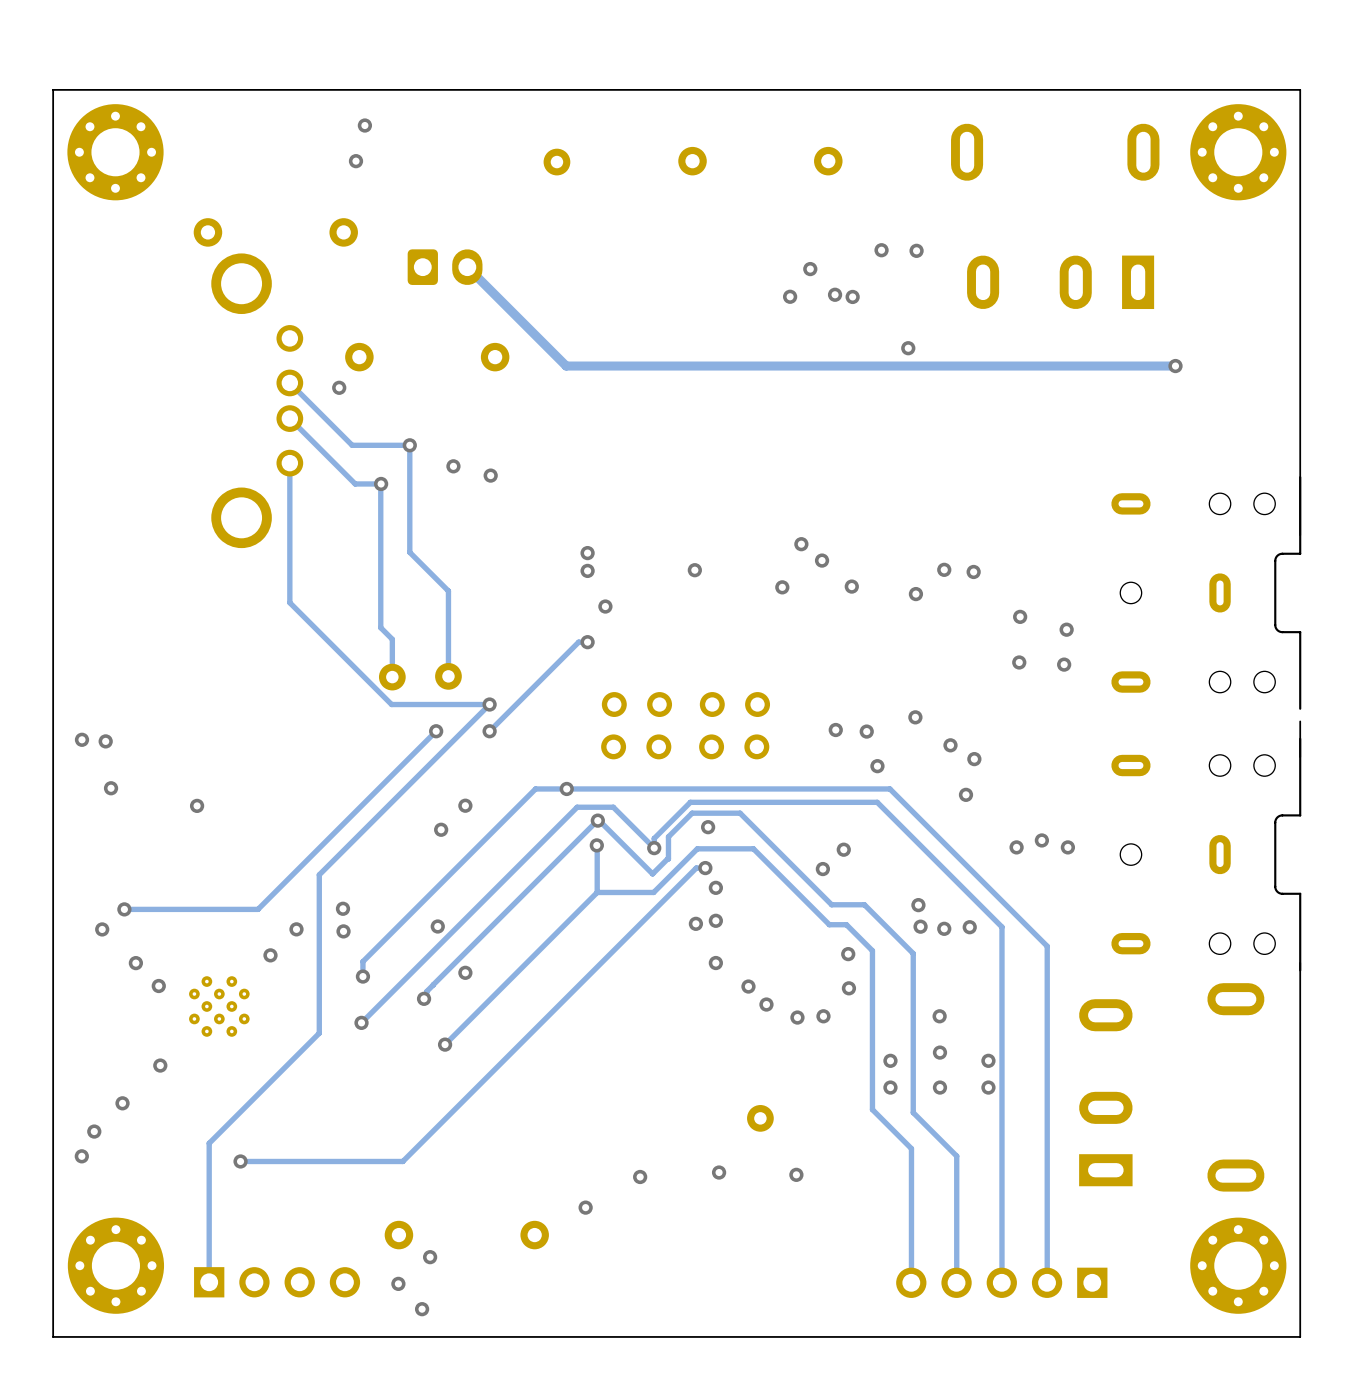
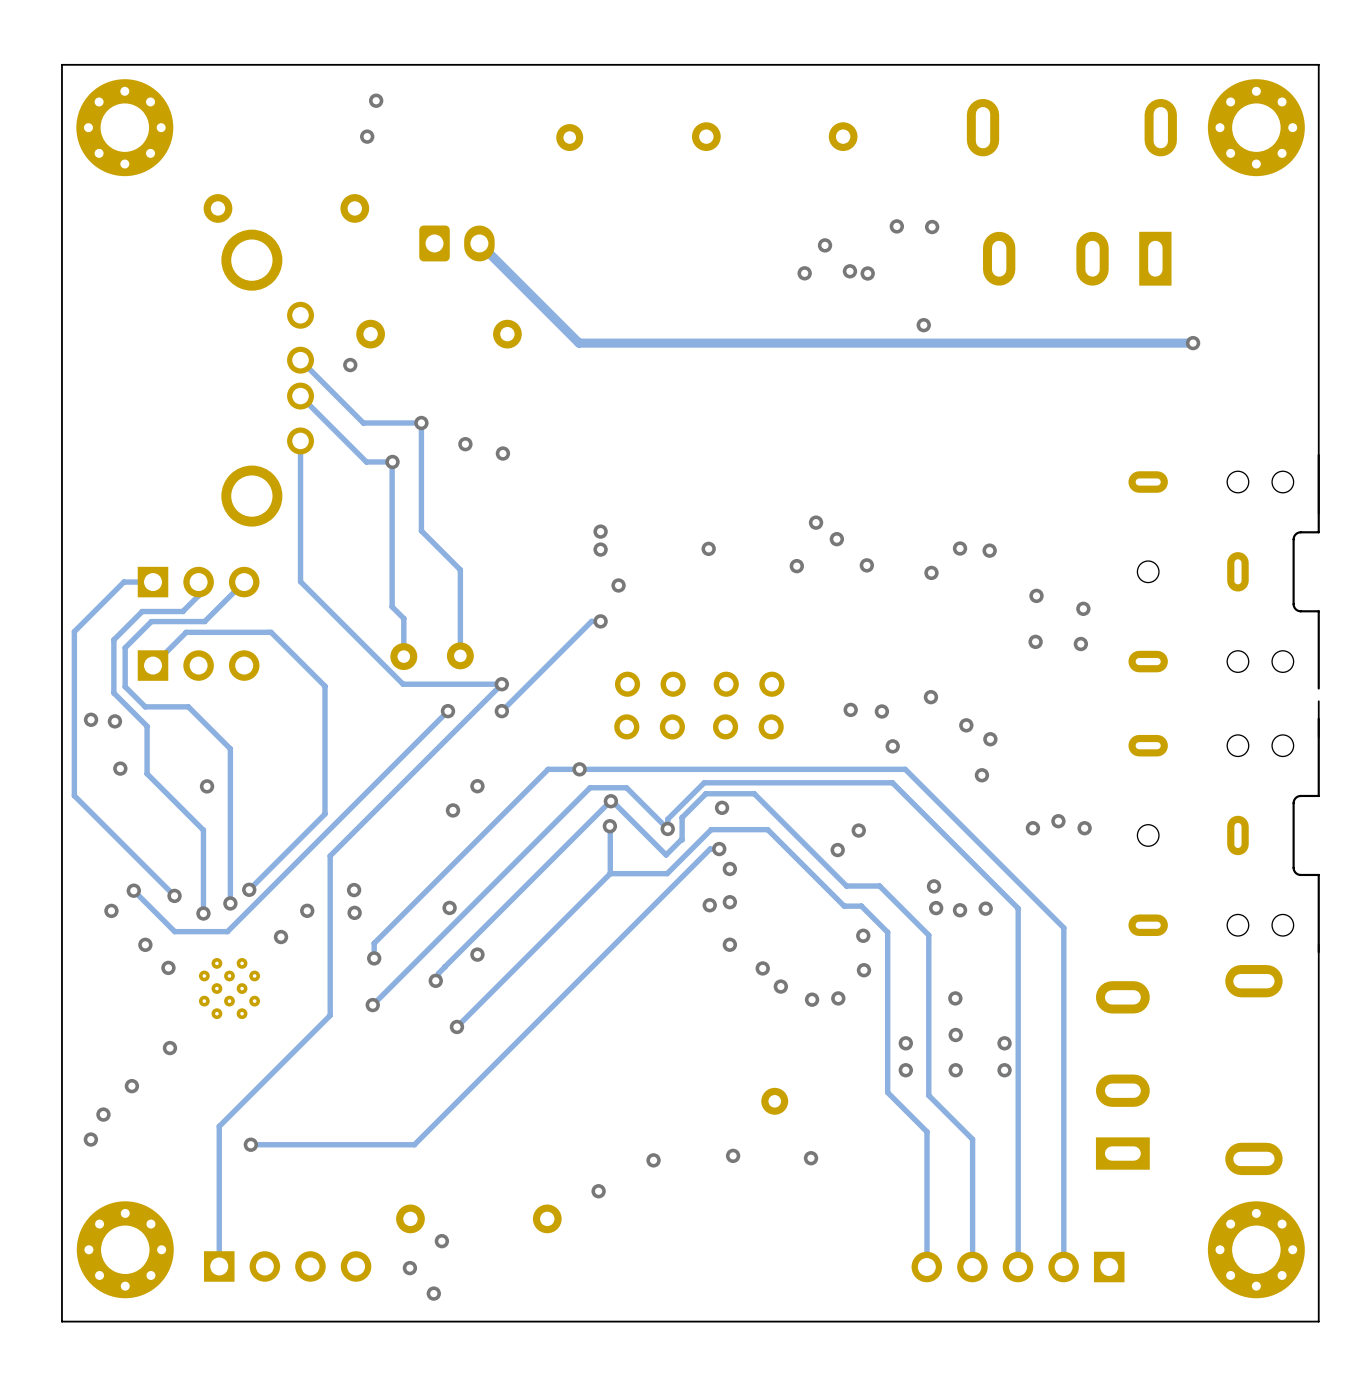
track: none -> (153, 582) (123, 582) (74, 631) (74, 795) (174, 895)
track: none -> (198, 582) (198, 595) (182, 611) (142, 611) (113, 639) (113, 693) (147, 726) (147, 773) (203, 830) (203, 913)
part: none -> (198, 582)
track: none -> (244, 582) (204, 621) (151, 621) (125, 647) (125, 686) (145, 706) (188, 706) (230, 748) (230, 903)
track: none -> (153, 665) (186, 632) (271, 632) (325, 686) (325, 814) (249, 889)
part: none -> (198, 665)
via: none -> (249, 889)
track: (258, 909) (124, 909) -> (268, 890) (227, 931) (174, 931) (133, 890)
via: none -> (174, 895)
via: none -> (230, 903)
via: none -> (203, 913)

